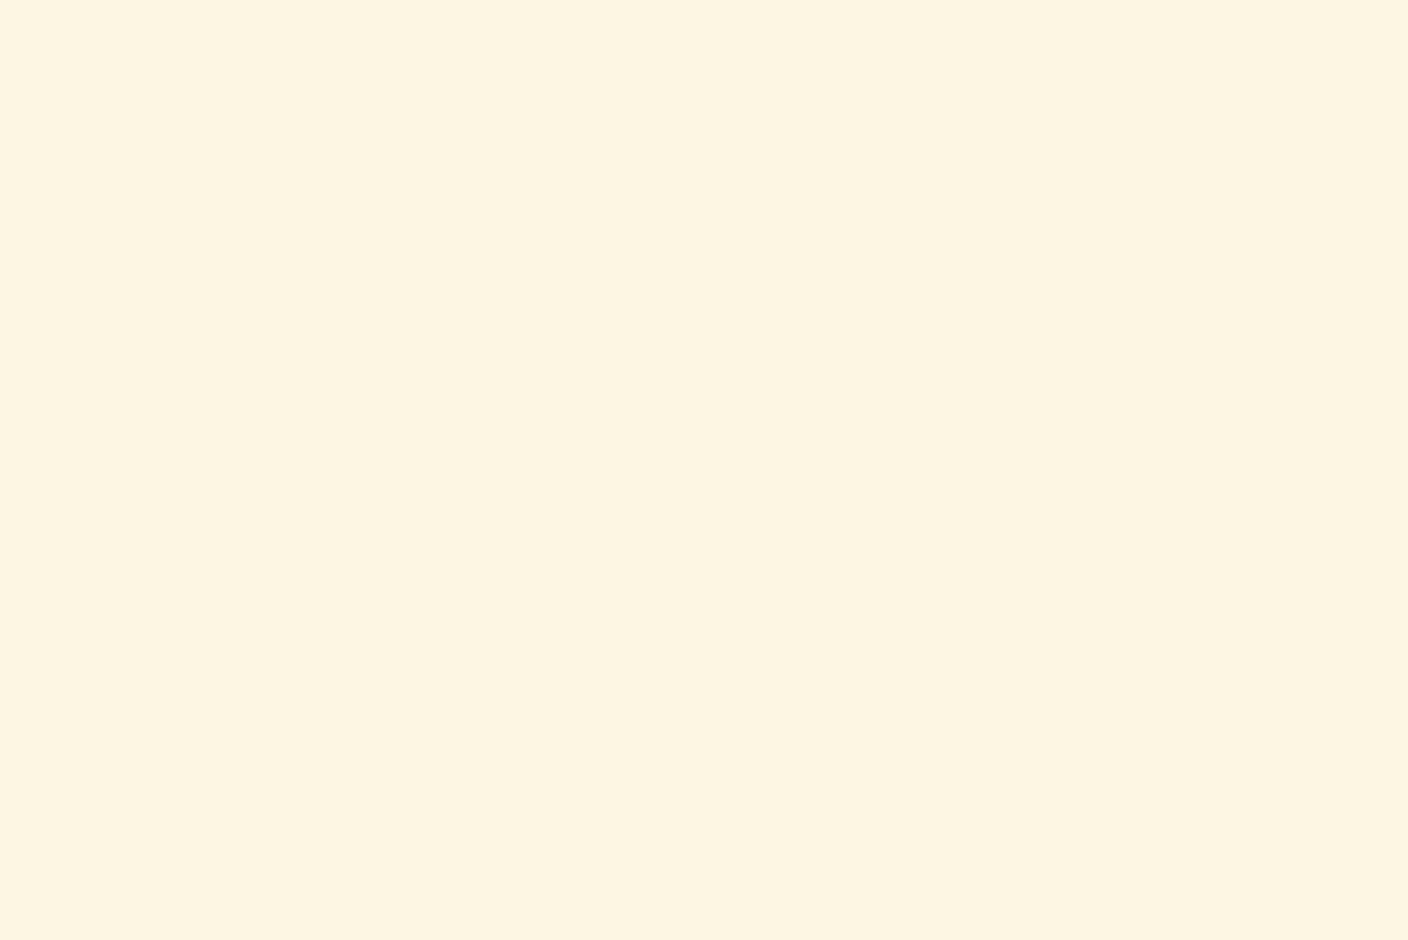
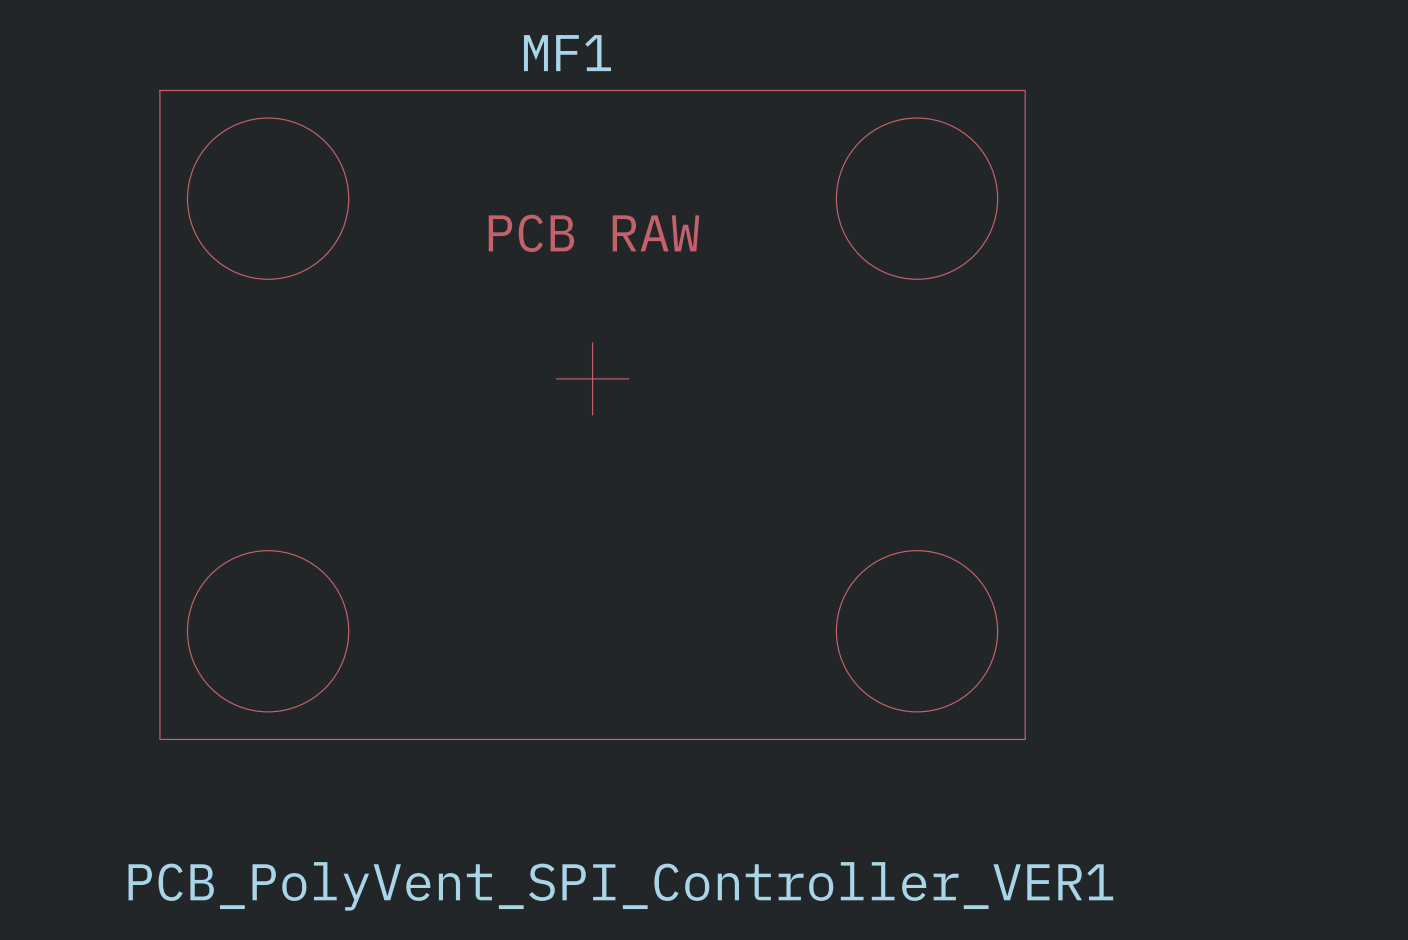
MF1: none -> PCB_PolyVent_SPI_Controller_VER1 (592, 414)

